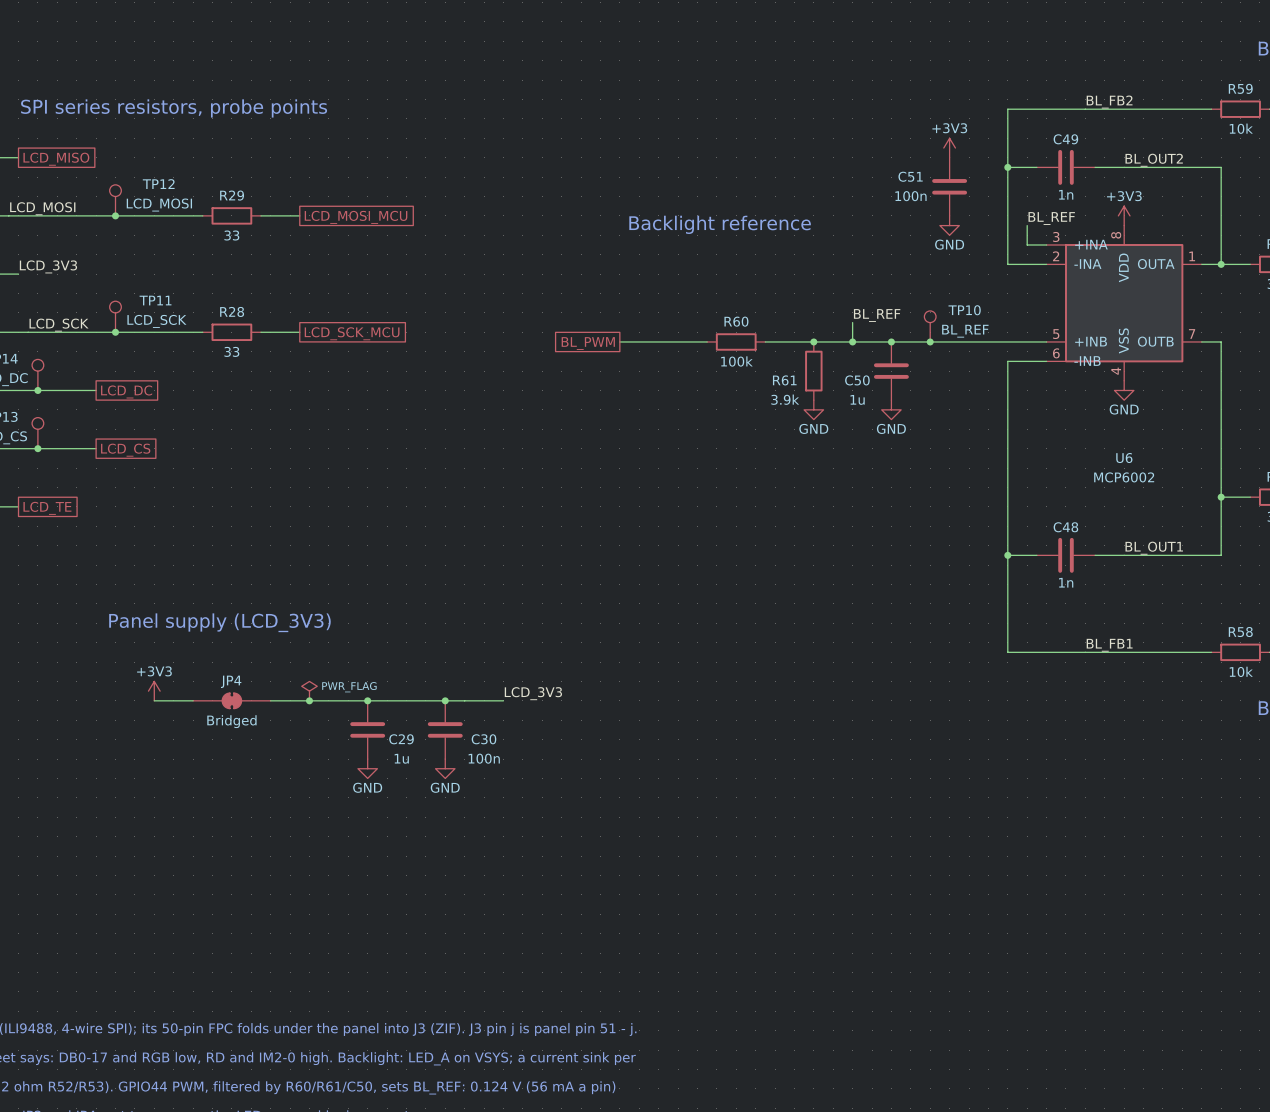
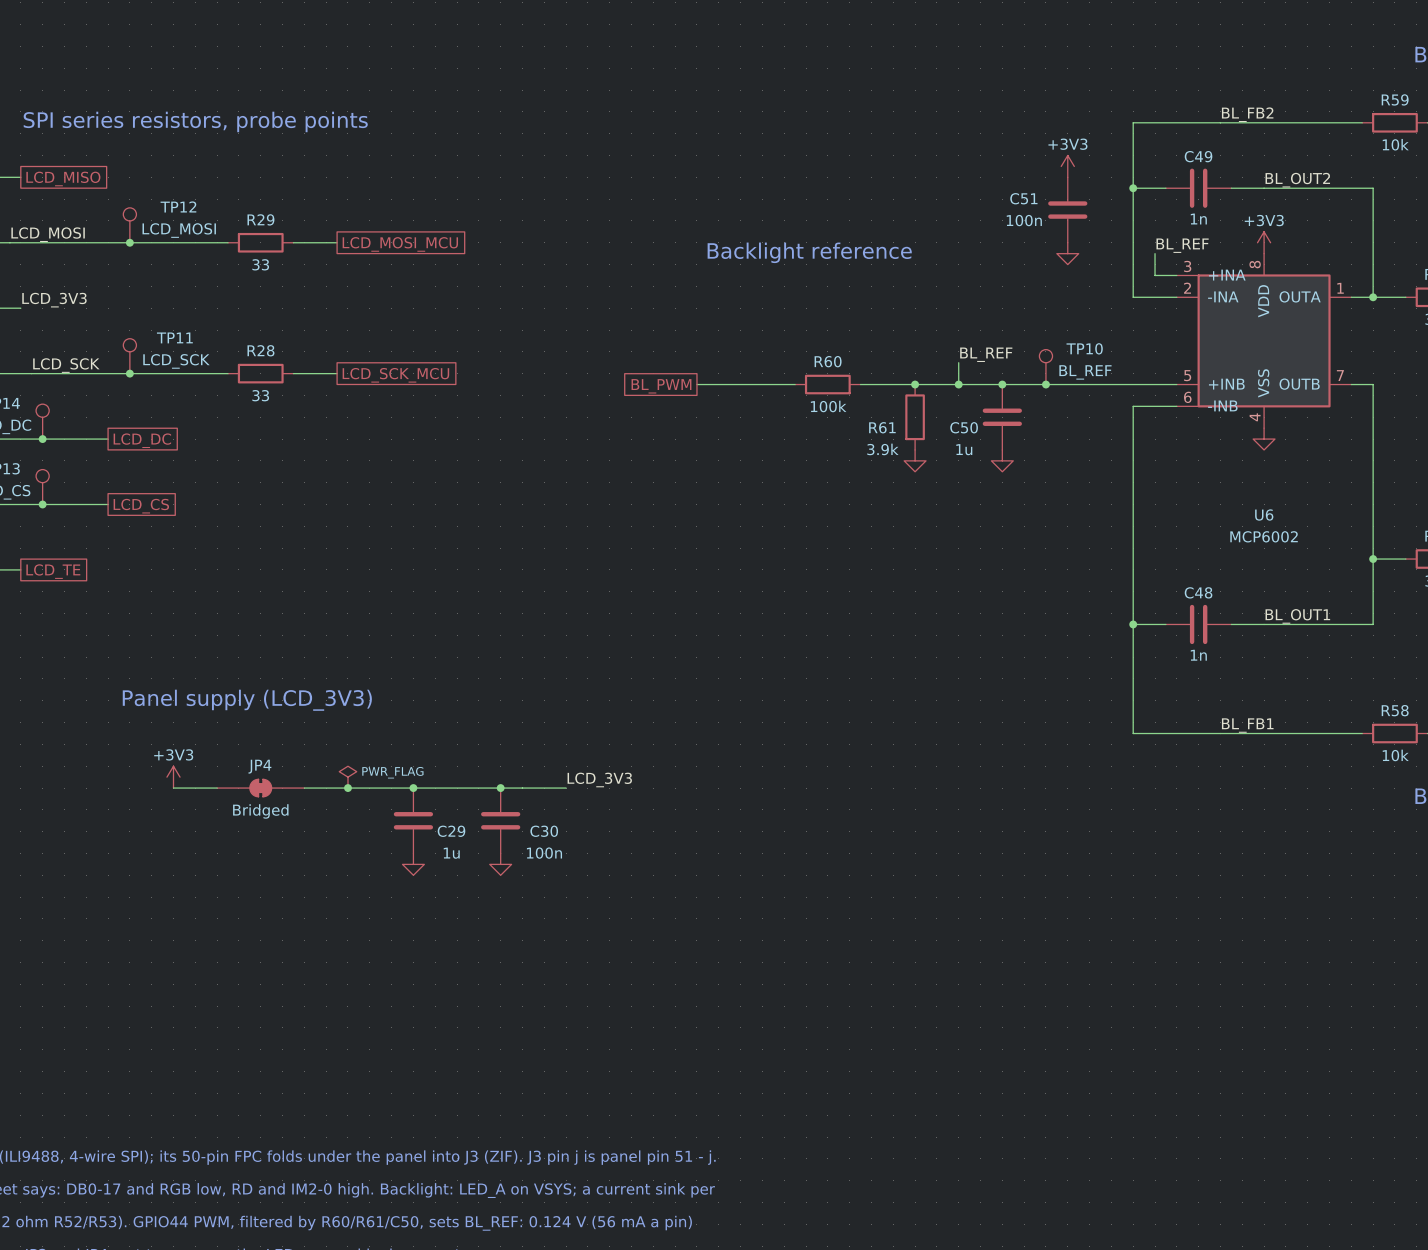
power symbol text: GND (949, 244) -> none
power symbol text: GND (1124, 409) -> none
power symbol text: GND (813, 428) -> none
power symbol text: GND (891, 428) -> none
power symbol text: GND (367, 787) -> none
power symbol text: GND (445, 787) -> none

